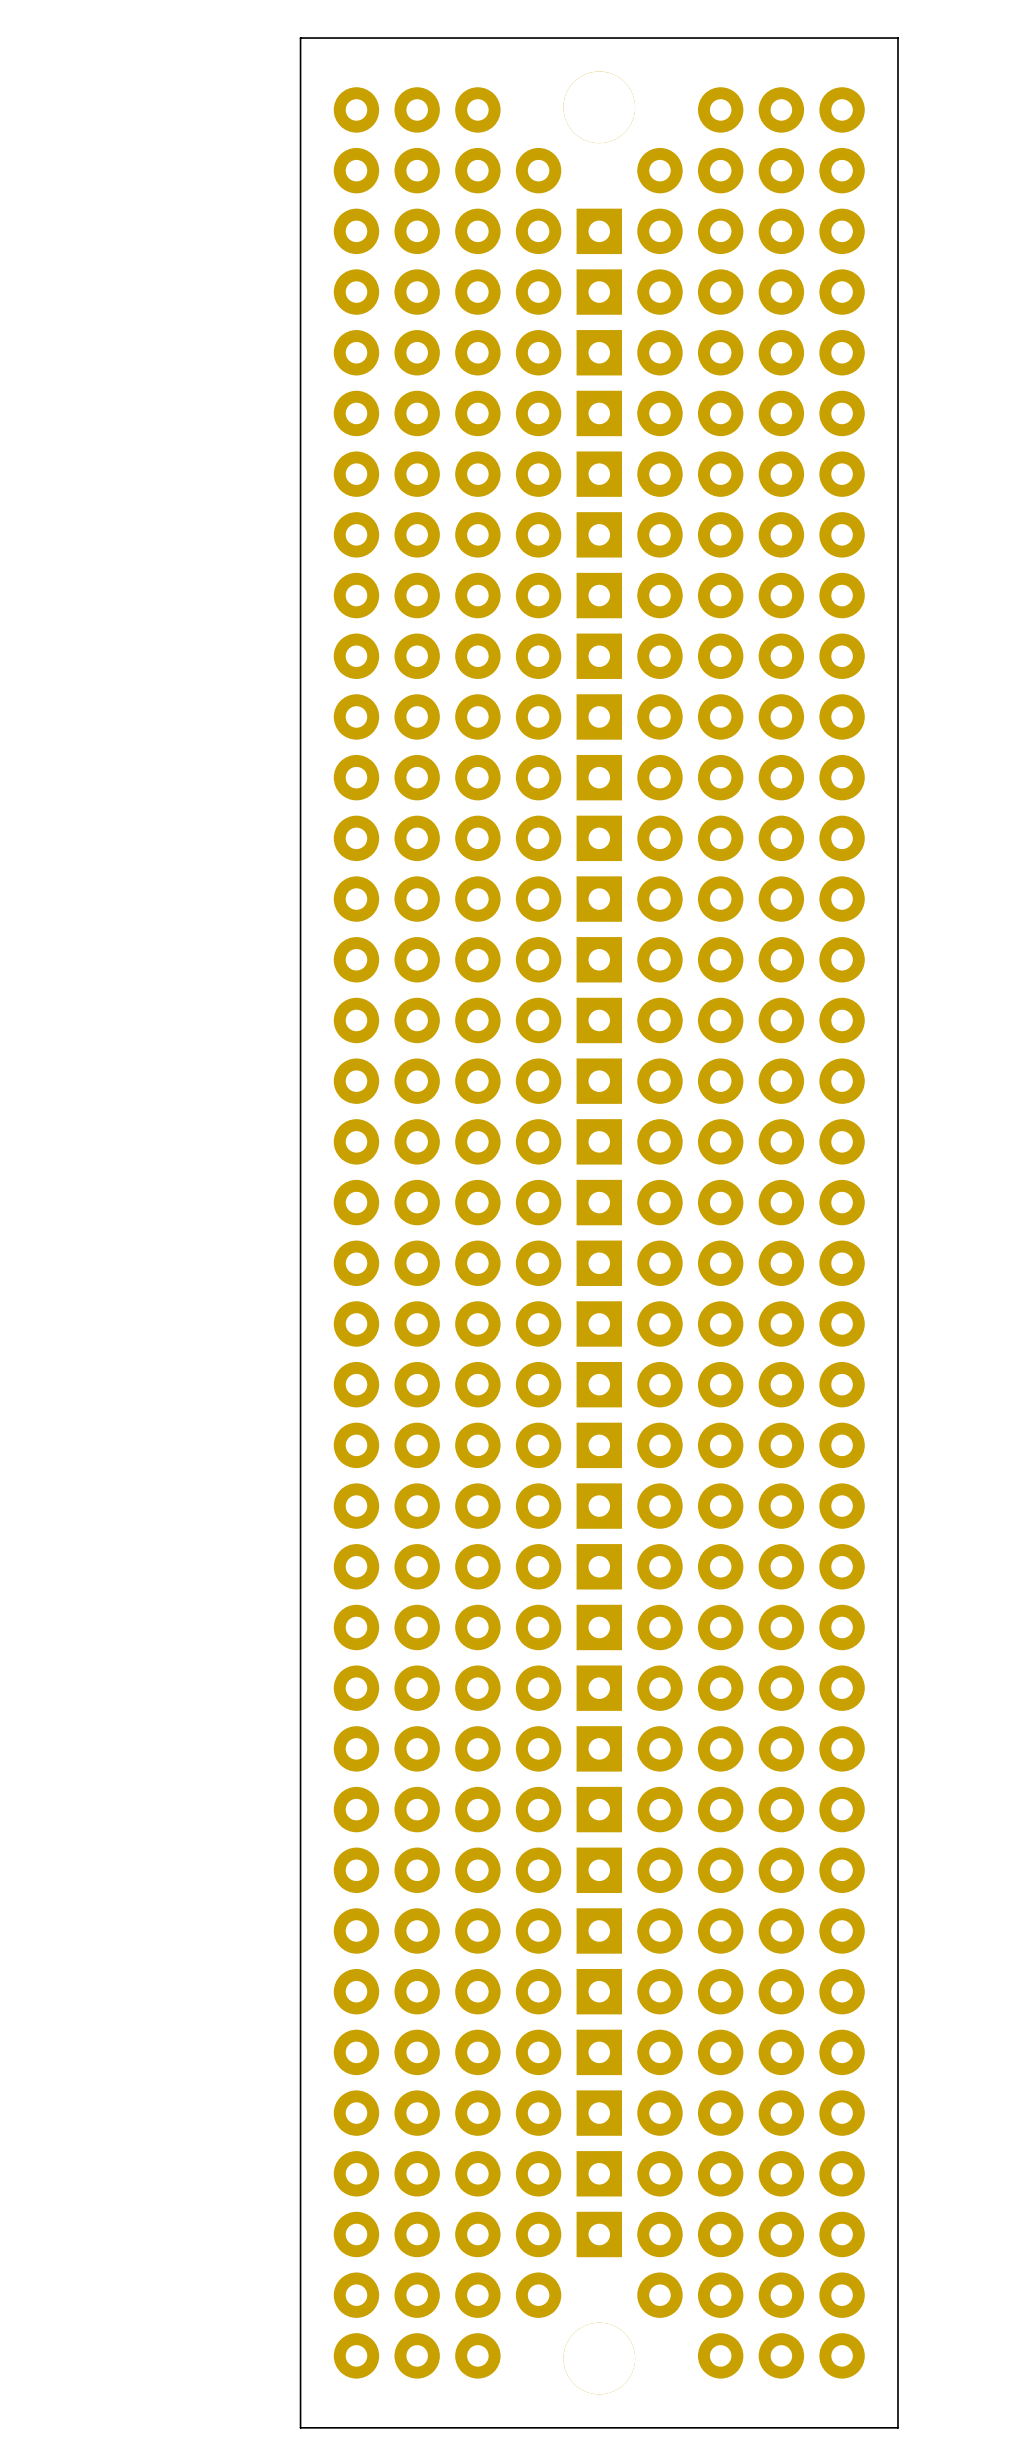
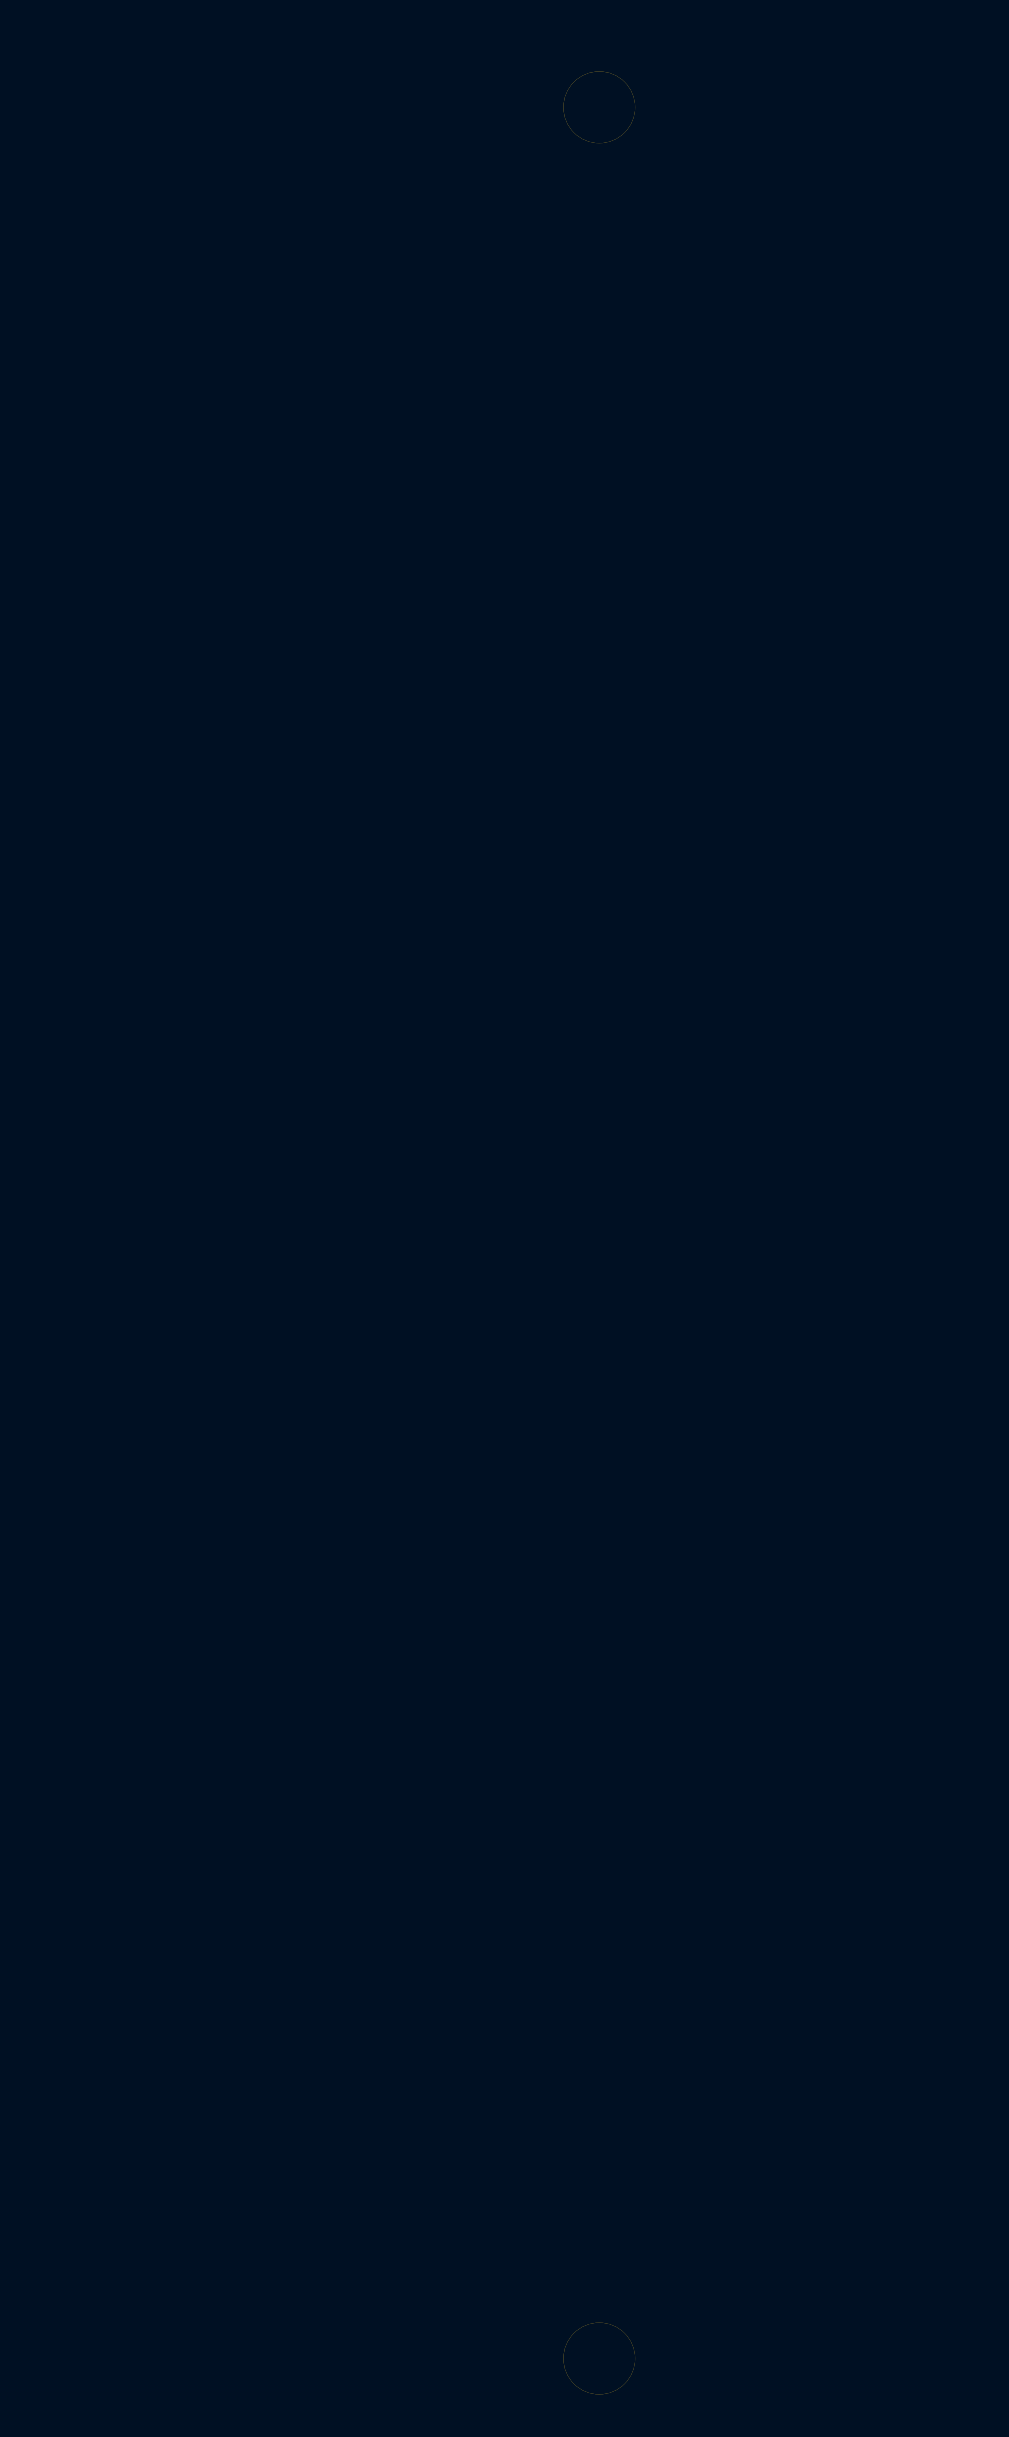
board edge: (898, 38) (300, 38) (300, 2427) (898, 2427) (898, 38) -> none
part: (356, 109) -> none
part: (417, 109) -> none
part: (477, 109) -> none
part: (720, 109) -> none
part: (781, 109) -> none
part: (842, 109) -> none
part: (356, 170) -> none
part: (417, 170) -> none
part: (477, 170) -> none
part: (538, 170) -> none
part: (659, 170) -> none
part: (720, 170) -> none
part: (781, 170) -> none
part: (842, 170) -> none
part: (356, 231) -> none
part: (417, 231) -> none
part: (477, 231) -> none
part: (538, 231) -> none
part: (599, 231) -> none
part: (659, 231) -> none
part: (720, 231) -> none
part: (781, 231) -> none
part: (842, 231) -> none
part: (356, 292) -> none
part: (417, 292) -> none
part: (477, 292) -> none
part: (538, 292) -> none
part: (599, 292) -> none
part: (659, 292) -> none
part: (720, 292) -> none
part: (781, 292) -> none
part: (842, 292) -> none
part: (356, 352) -> none
part: (417, 352) -> none
part: (477, 352) -> none
part: (538, 352) -> none
part: (599, 352) -> none
part: (659, 352) -> none
part: (720, 352) -> none
part: (781, 352) -> none
part: (842, 352) -> none
part: (356, 413) -> none
part: (417, 413) -> none
part: (477, 413) -> none
part: (538, 413) -> none
part: (599, 413) -> none
part: (659, 413) -> none
part: (720, 413) -> none
part: (781, 413) -> none
part: (842, 413) -> none
part: (356, 474) -> none
part: (417, 474) -> none
part: (477, 474) -> none
part: (538, 474) -> none
part: (599, 474) -> none
part: (659, 474) -> none
part: (720, 474) -> none
part: (781, 474) -> none
part: (842, 474) -> none
part: (356, 534) -> none
part: (417, 534) -> none
part: (477, 534) -> none
part: (538, 534) -> none
part: (599, 534) -> none
part: (659, 534) -> none
part: (720, 534) -> none
part: (781, 534) -> none
part: (842, 534) -> none
part: (356, 595) -> none
part: (417, 595) -> none
part: (477, 595) -> none
part: (538, 595) -> none
part: (599, 595) -> none
part: (659, 595) -> none
part: (720, 595) -> none
part: (781, 595) -> none
part: (842, 595) -> none
part: (356, 656) -> none
part: (417, 656) -> none
part: (477, 656) -> none
part: (538, 656) -> none
part: (599, 656) -> none
part: (659, 656) -> none
part: (720, 656) -> none
part: (781, 656) -> none
part: (842, 656) -> none
part: (356, 716) -> none
part: (417, 716) -> none
part: (477, 716) -> none
part: (538, 716) -> none
part: (599, 716) -> none
part: (659, 716) -> none
part: (720, 716) -> none
part: (781, 716) -> none
part: (842, 716) -> none
part: (356, 777) -> none
part: (417, 777) -> none
part: (477, 777) -> none
part: (538, 777) -> none
part: (599, 777) -> none
part: (659, 777) -> none
part: (720, 777) -> none
part: (781, 777) -> none
part: (842, 777) -> none
part: (356, 838) -> none
part: (417, 838) -> none
part: (477, 838) -> none
part: (538, 838) -> none
part: (599, 838) -> none
part: (659, 838) -> none
part: (720, 838) -> none
part: (781, 838) -> none
part: (842, 838) -> none
part: (356, 899) -> none
part: (417, 899) -> none
part: (477, 899) -> none
part: (538, 899) -> none
part: (599, 899) -> none
part: (659, 899) -> none
part: (720, 899) -> none
part: (781, 899) -> none
part: (842, 899) -> none
part: (356, 959) -> none
part: (417, 959) -> none
part: (477, 959) -> none
part: (538, 959) -> none
part: (599, 959) -> none
part: (659, 959) -> none
part: (720, 959) -> none
part: (781, 959) -> none
part: (842, 959) -> none
part: (356, 1020) -> none
part: (417, 1020) -> none
part: (477, 1020) -> none
part: (538, 1020) -> none
part: (599, 1020) -> none
part: (659, 1020) -> none
part: (720, 1020) -> none
part: (781, 1020) -> none
part: (842, 1020) -> none
part: (356, 1081) -> none
part: (417, 1081) -> none
part: (477, 1081) -> none
part: (538, 1081) -> none
part: (599, 1081) -> none
part: (659, 1081) -> none
part: (720, 1081) -> none
part: (781, 1081) -> none
part: (842, 1081) -> none
part: (356, 1141) -> none
part: (417, 1141) -> none
part: (477, 1141) -> none
part: (538, 1141) -> none
part: (599, 1141) -> none
part: (659, 1141) -> none
part: (720, 1141) -> none
part: (781, 1141) -> none
part: (842, 1141) -> none
part: (356, 1202) -> none
part: (417, 1202) -> none
part: (477, 1202) -> none
part: (538, 1202) -> none
part: (599, 1202) -> none
part: (659, 1202) -> none
part: (720, 1202) -> none
part: (781, 1202) -> none
part: (842, 1202) -> none
part: (356, 1263) -> none
part: (417, 1263) -> none
part: (477, 1263) -> none
part: (538, 1263) -> none
part: (599, 1263) -> none
part: (659, 1263) -> none
part: (720, 1263) -> none
part: (781, 1263) -> none
part: (842, 1263) -> none
part: (356, 1323) -> none
part: (417, 1323) -> none
part: (477, 1323) -> none
part: (538, 1323) -> none
part: (599, 1323) -> none
part: (659, 1323) -> none
part: (720, 1323) -> none
part: (781, 1323) -> none
part: (842, 1323) -> none
part: (356, 1384) -> none
part: (417, 1384) -> none
part: (477, 1384) -> none
part: (538, 1384) -> none
part: (599, 1384) -> none
part: (659, 1384) -> none
part: (720, 1384) -> none
part: (781, 1384) -> none
part: (842, 1384) -> none
part: (356, 1445) -> none
part: (417, 1445) -> none
part: (477, 1445) -> none
part: (538, 1445) -> none
part: (599, 1445) -> none
part: (659, 1445) -> none
part: (720, 1445) -> none
part: (781, 1445) -> none
part: (842, 1445) -> none
part: (356, 1506) -> none
part: (417, 1506) -> none
part: (477, 1506) -> none
part: (538, 1506) -> none
part: (599, 1506) -> none
part: (659, 1506) -> none
part: (720, 1506) -> none
part: (781, 1506) -> none
part: (842, 1506) -> none
part: (356, 1566) -> none
part: (417, 1566) -> none
part: (477, 1566) -> none
part: (538, 1566) -> none
part: (599, 1566) -> none
part: (659, 1566) -> none
part: (720, 1566) -> none
part: (781, 1566) -> none
part: (842, 1566) -> none
part: (356, 1627) -> none
part: (417, 1627) -> none
part: (477, 1627) -> none
part: (538, 1627) -> none
part: (599, 1627) -> none
part: (659, 1627) -> none
part: (720, 1627) -> none
part: (781, 1627) -> none
part: (842, 1627) -> none
part: (356, 1688) -> none
part: (417, 1688) -> none
part: (477, 1688) -> none
part: (538, 1688) -> none
part: (599, 1688) -> none
part: (659, 1688) -> none
part: (720, 1688) -> none
part: (781, 1688) -> none
part: (842, 1688) -> none
part: (356, 1748) -> none
part: (417, 1748) -> none
part: (477, 1748) -> none
part: (538, 1748) -> none
part: (599, 1748) -> none
part: (659, 1748) -> none
part: (720, 1748) -> none
part: (781, 1748) -> none
part: (842, 1748) -> none
part: (356, 1809) -> none
part: (417, 1809) -> none
part: (477, 1809) -> none
part: (538, 1809) -> none
part: (599, 1809) -> none
part: (659, 1809) -> none
part: (720, 1809) -> none
part: (781, 1809) -> none
part: (842, 1809) -> none
part: (356, 1870) -> none
part: (417, 1870) -> none
part: (477, 1870) -> none
part: (538, 1870) -> none
part: (599, 1870) -> none
part: (659, 1870) -> none
part: (720, 1870) -> none
part: (781, 1870) -> none
part: (842, 1870) -> none
part: (356, 1930) -> none
part: (417, 1930) -> none
part: (477, 1930) -> none
part: (538, 1930) -> none
part: (599, 1930) -> none
part: (659, 1930) -> none
part: (720, 1930) -> none
part: (781, 1930) -> none
part: (842, 1930) -> none
part: (356, 1991) -> none
part: (417, 1991) -> none
part: (477, 1991) -> none
part: (538, 1991) -> none
part: (599, 1991) -> none
part: (659, 1991) -> none
part: (720, 1991) -> none
part: (781, 1991) -> none
part: (842, 1991) -> none
part: (356, 2052) -> none
part: (417, 2052) -> none
part: (477, 2052) -> none
part: (538, 2052) -> none
part: (599, 2052) -> none
part: (659, 2052) -> none
part: (720, 2052) -> none
part: (781, 2052) -> none
part: (842, 2052) -> none
part: (356, 2113) -> none
part: (417, 2113) -> none
part: (477, 2113) -> none
part: (538, 2113) -> none
part: (599, 2113) -> none
part: (659, 2113) -> none
part: (720, 2113) -> none
part: (781, 2113) -> none
part: (842, 2113) -> none
part: (356, 2173) -> none
part: (417, 2173) -> none
part: (477, 2173) -> none
part: (538, 2173) -> none
part: (599, 2173) -> none
part: (659, 2173) -> none
part: (720, 2173) -> none
part: (781, 2173) -> none
part: (842, 2173) -> none
part: (356, 2234) -> none
part: (417, 2234) -> none
part: (477, 2234) -> none
part: (538, 2234) -> none
part: (599, 2234) -> none
part: (659, 2234) -> none
part: (720, 2234) -> none
part: (781, 2234) -> none
part: (842, 2234) -> none
part: (356, 2295) -> none
part: (417, 2295) -> none
part: (477, 2295) -> none
part: (538, 2295) -> none
part: (659, 2295) -> none
part: (720, 2295) -> none
part: (781, 2295) -> none
part: (842, 2295) -> none
part: (356, 2355) -> none
part: (417, 2355) -> none
part: (477, 2355) -> none
part: (720, 2355) -> none
part: (781, 2355) -> none
part: (842, 2355) -> none

